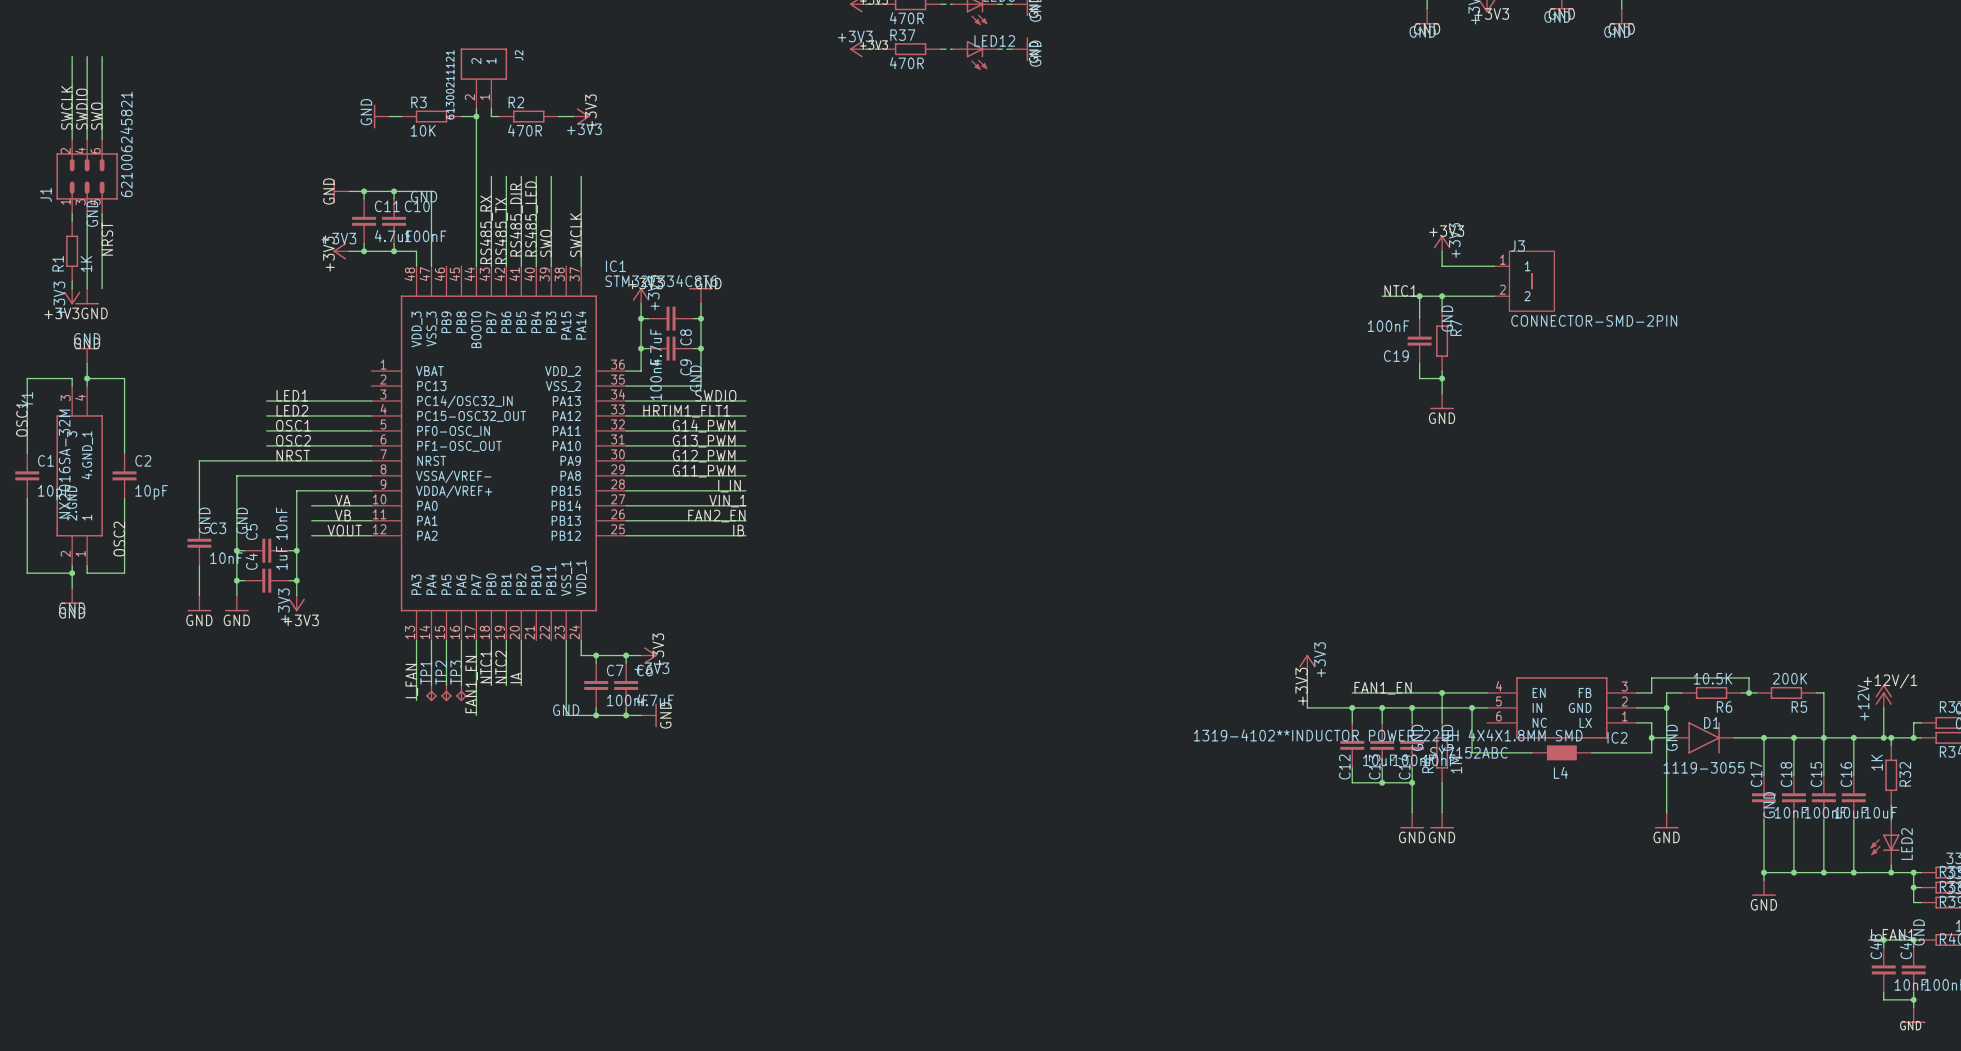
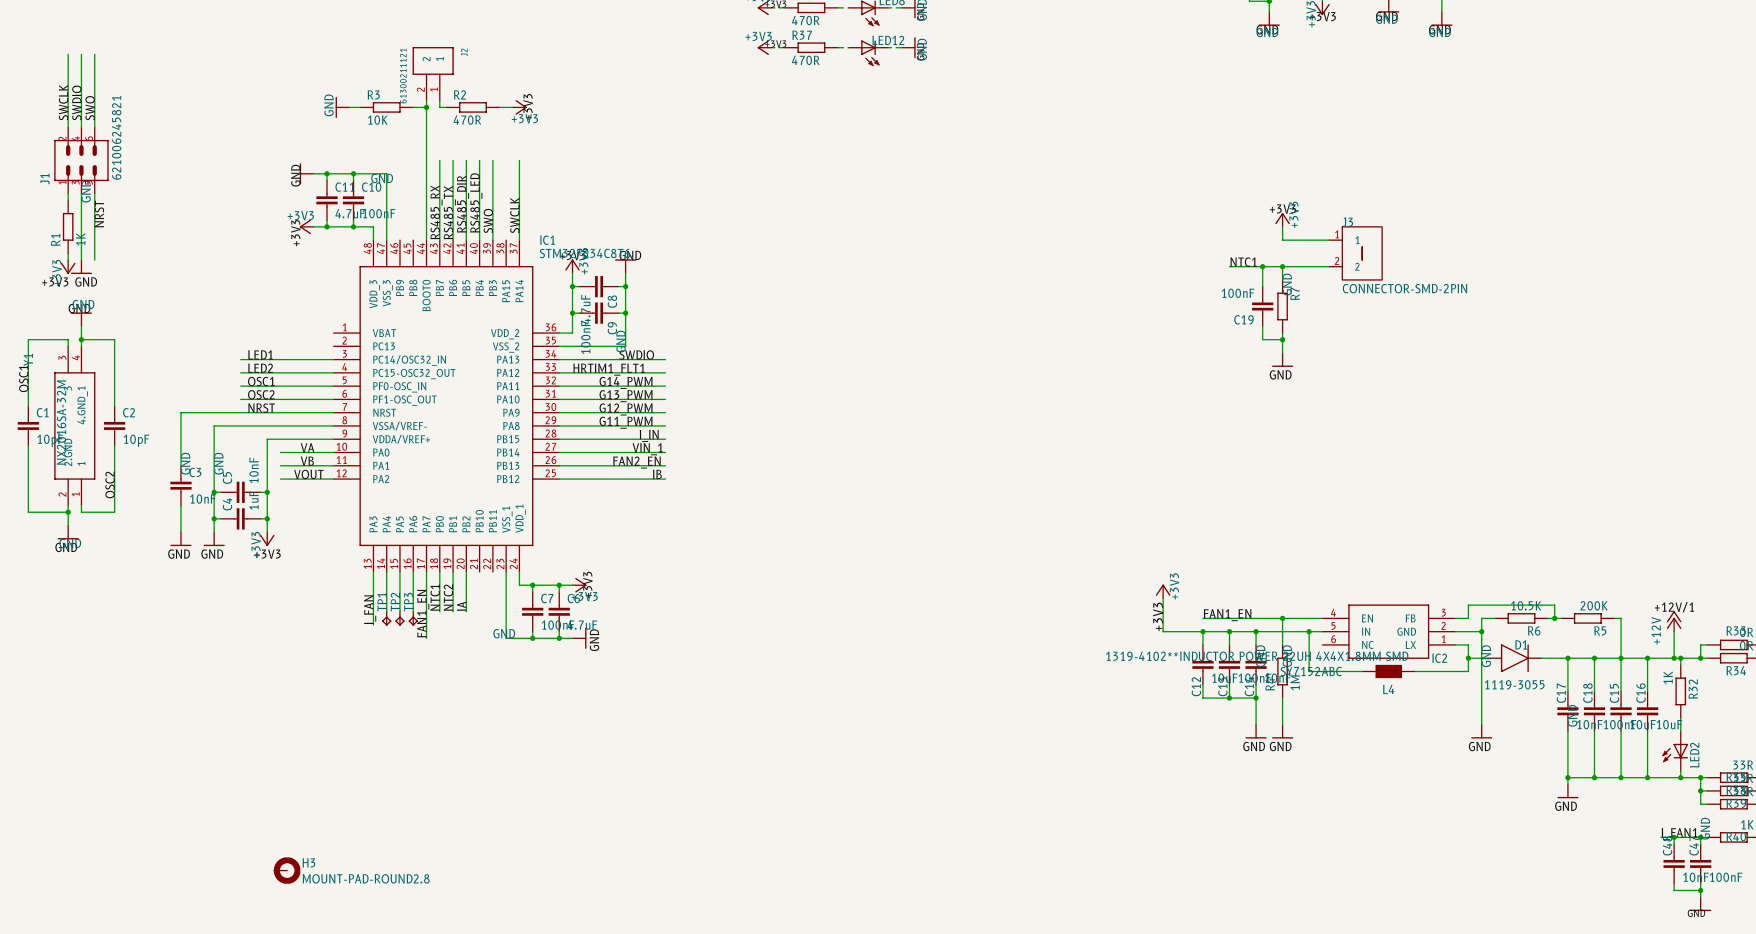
H3: none -> MOUNT-PAD-ROUND2.8 (287, 870)

